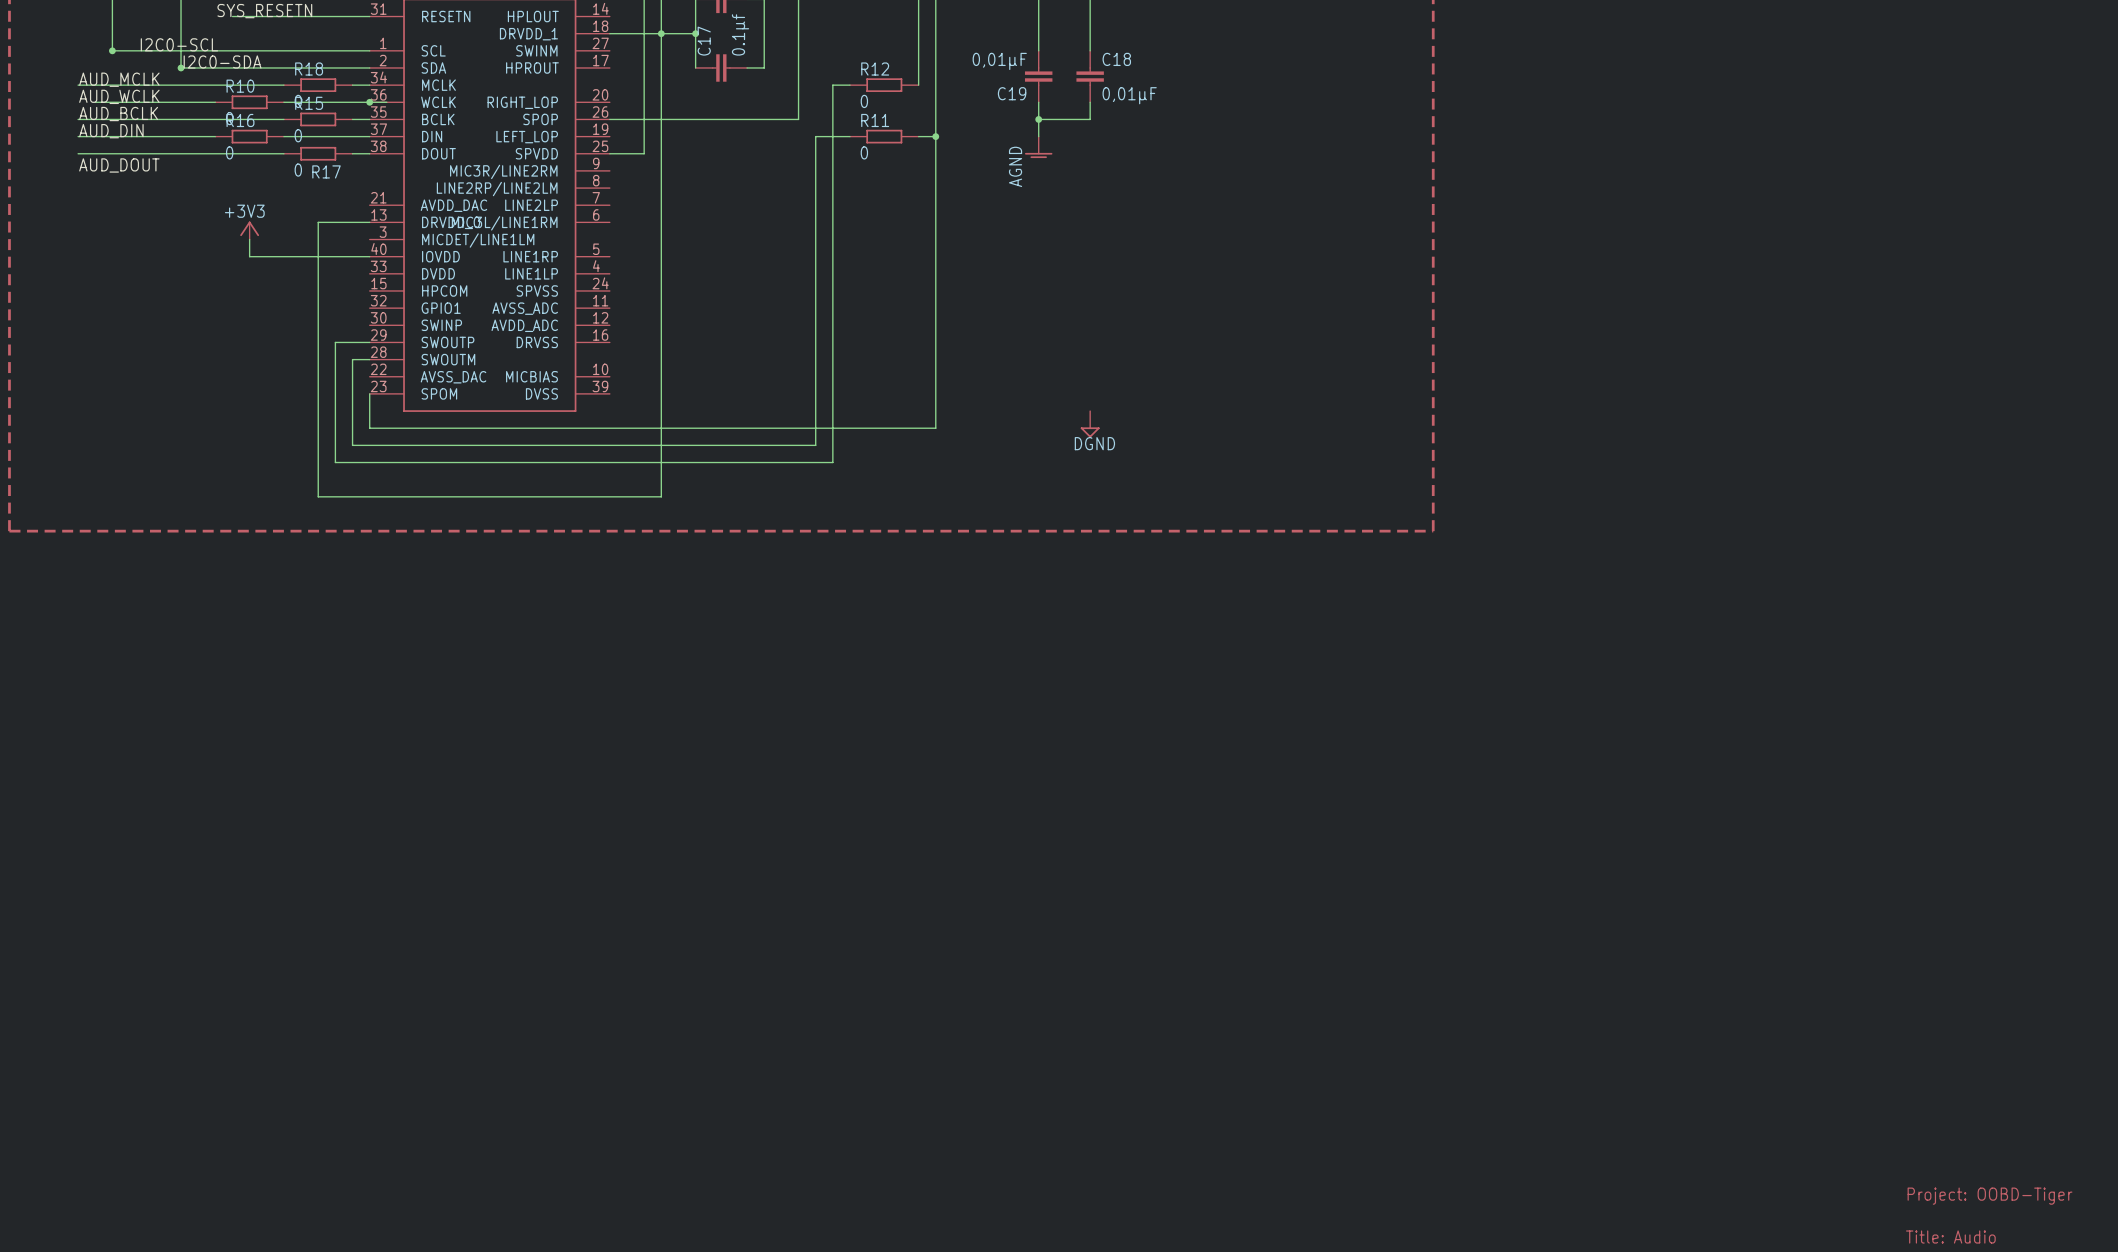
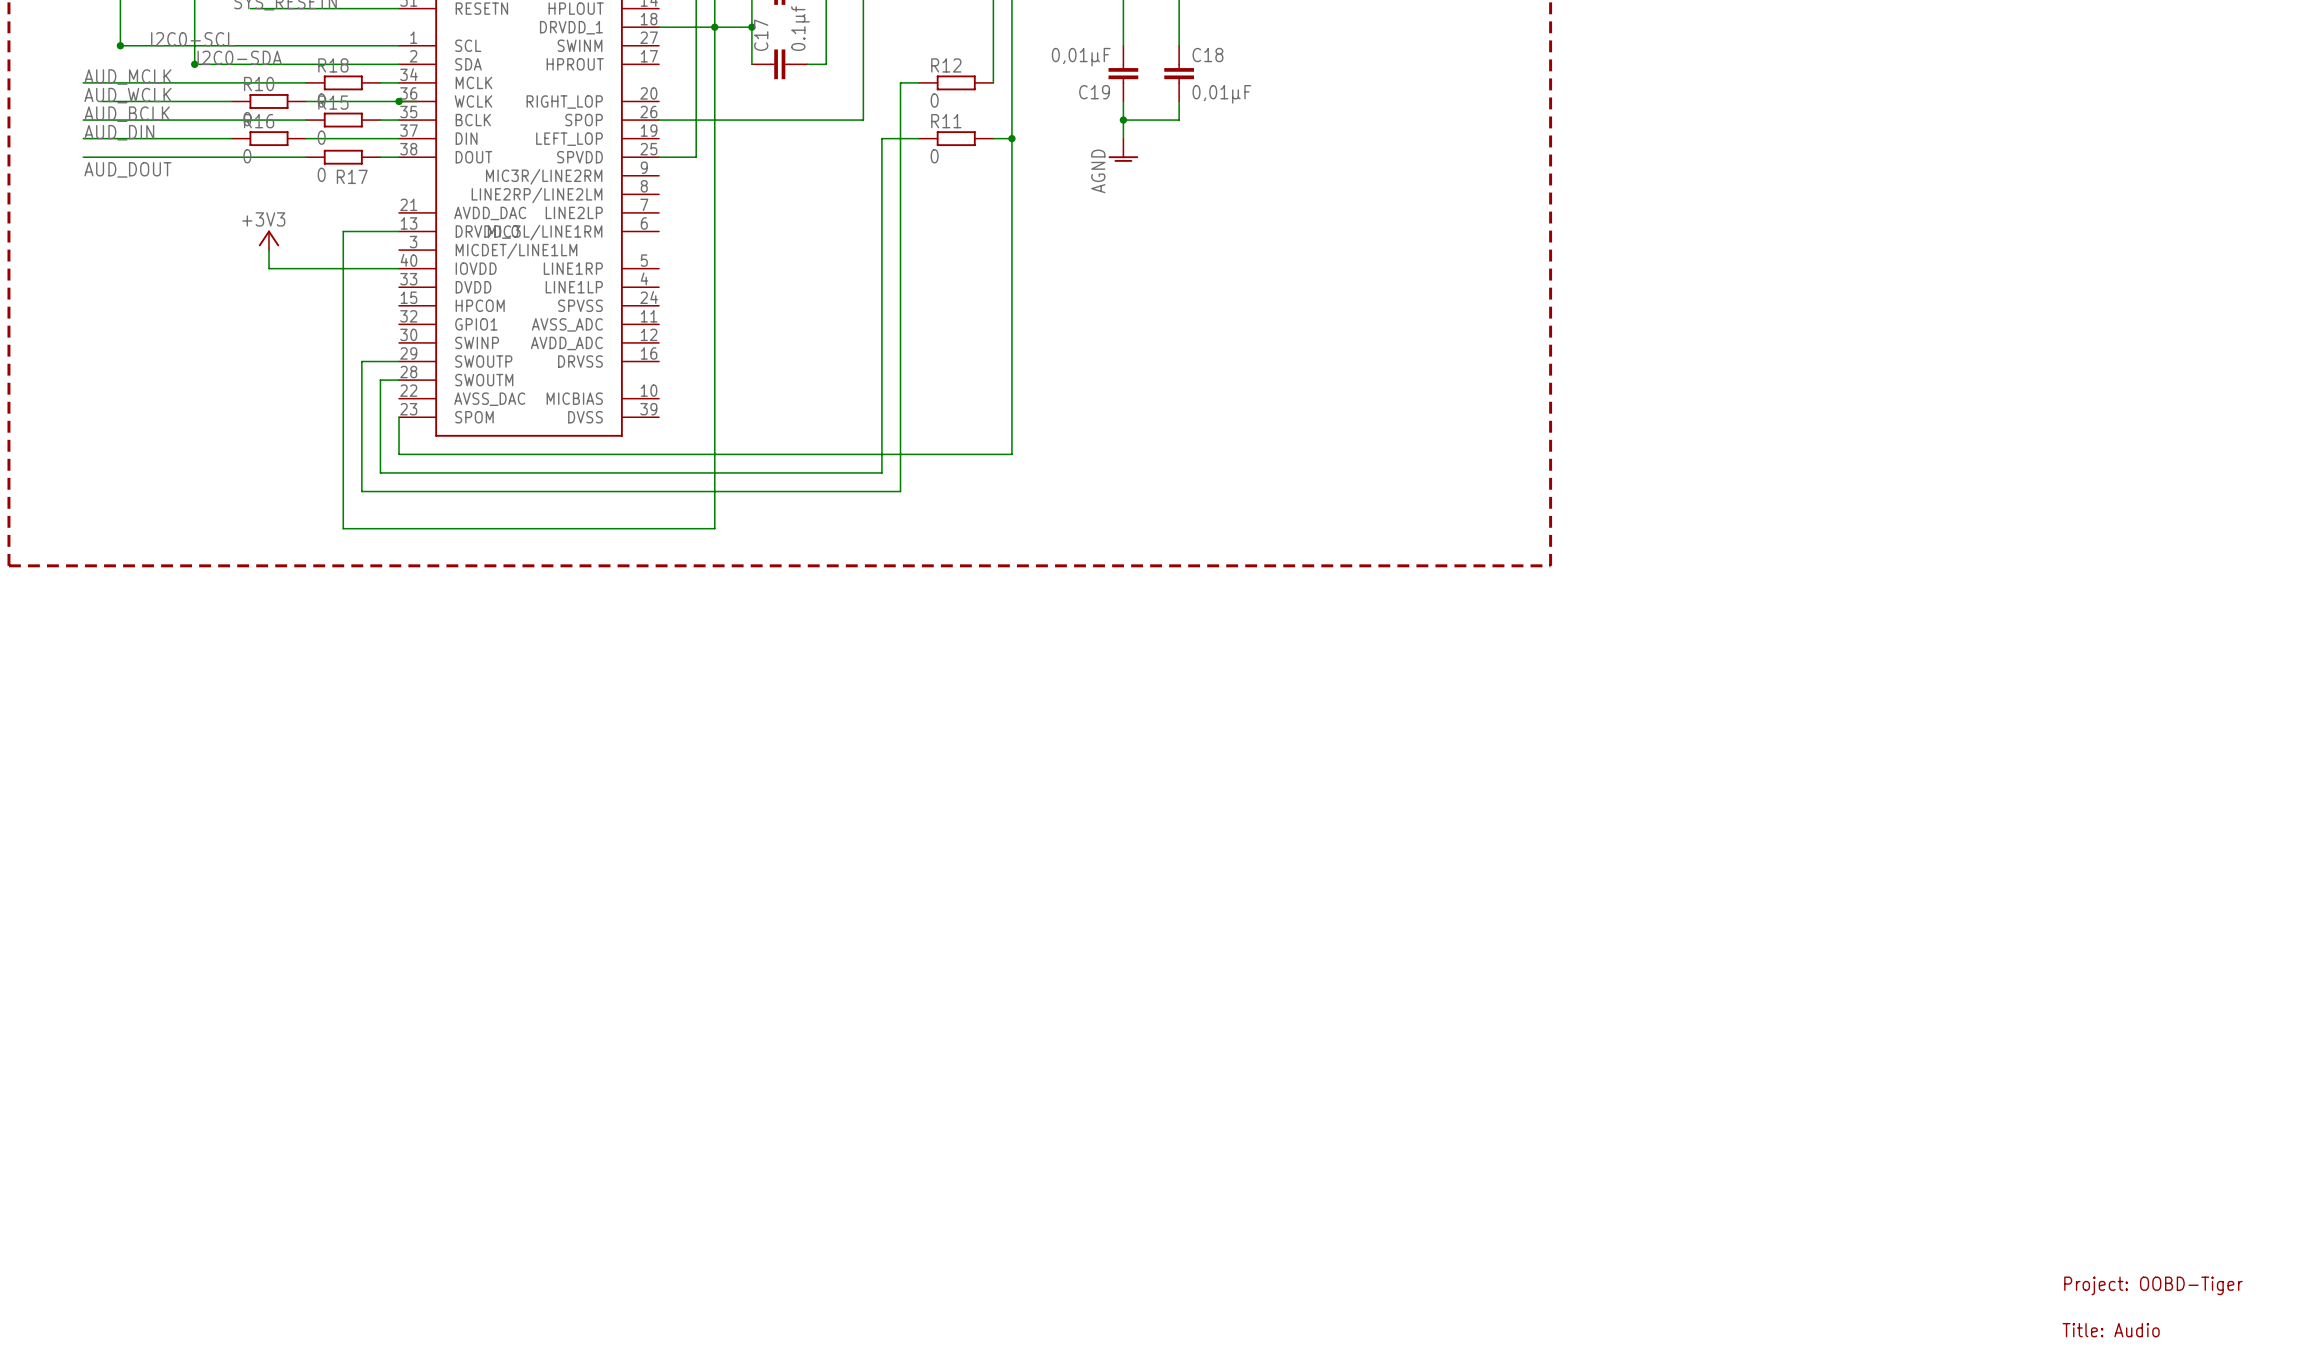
power symbol: DGND (1090, 424) -> none

